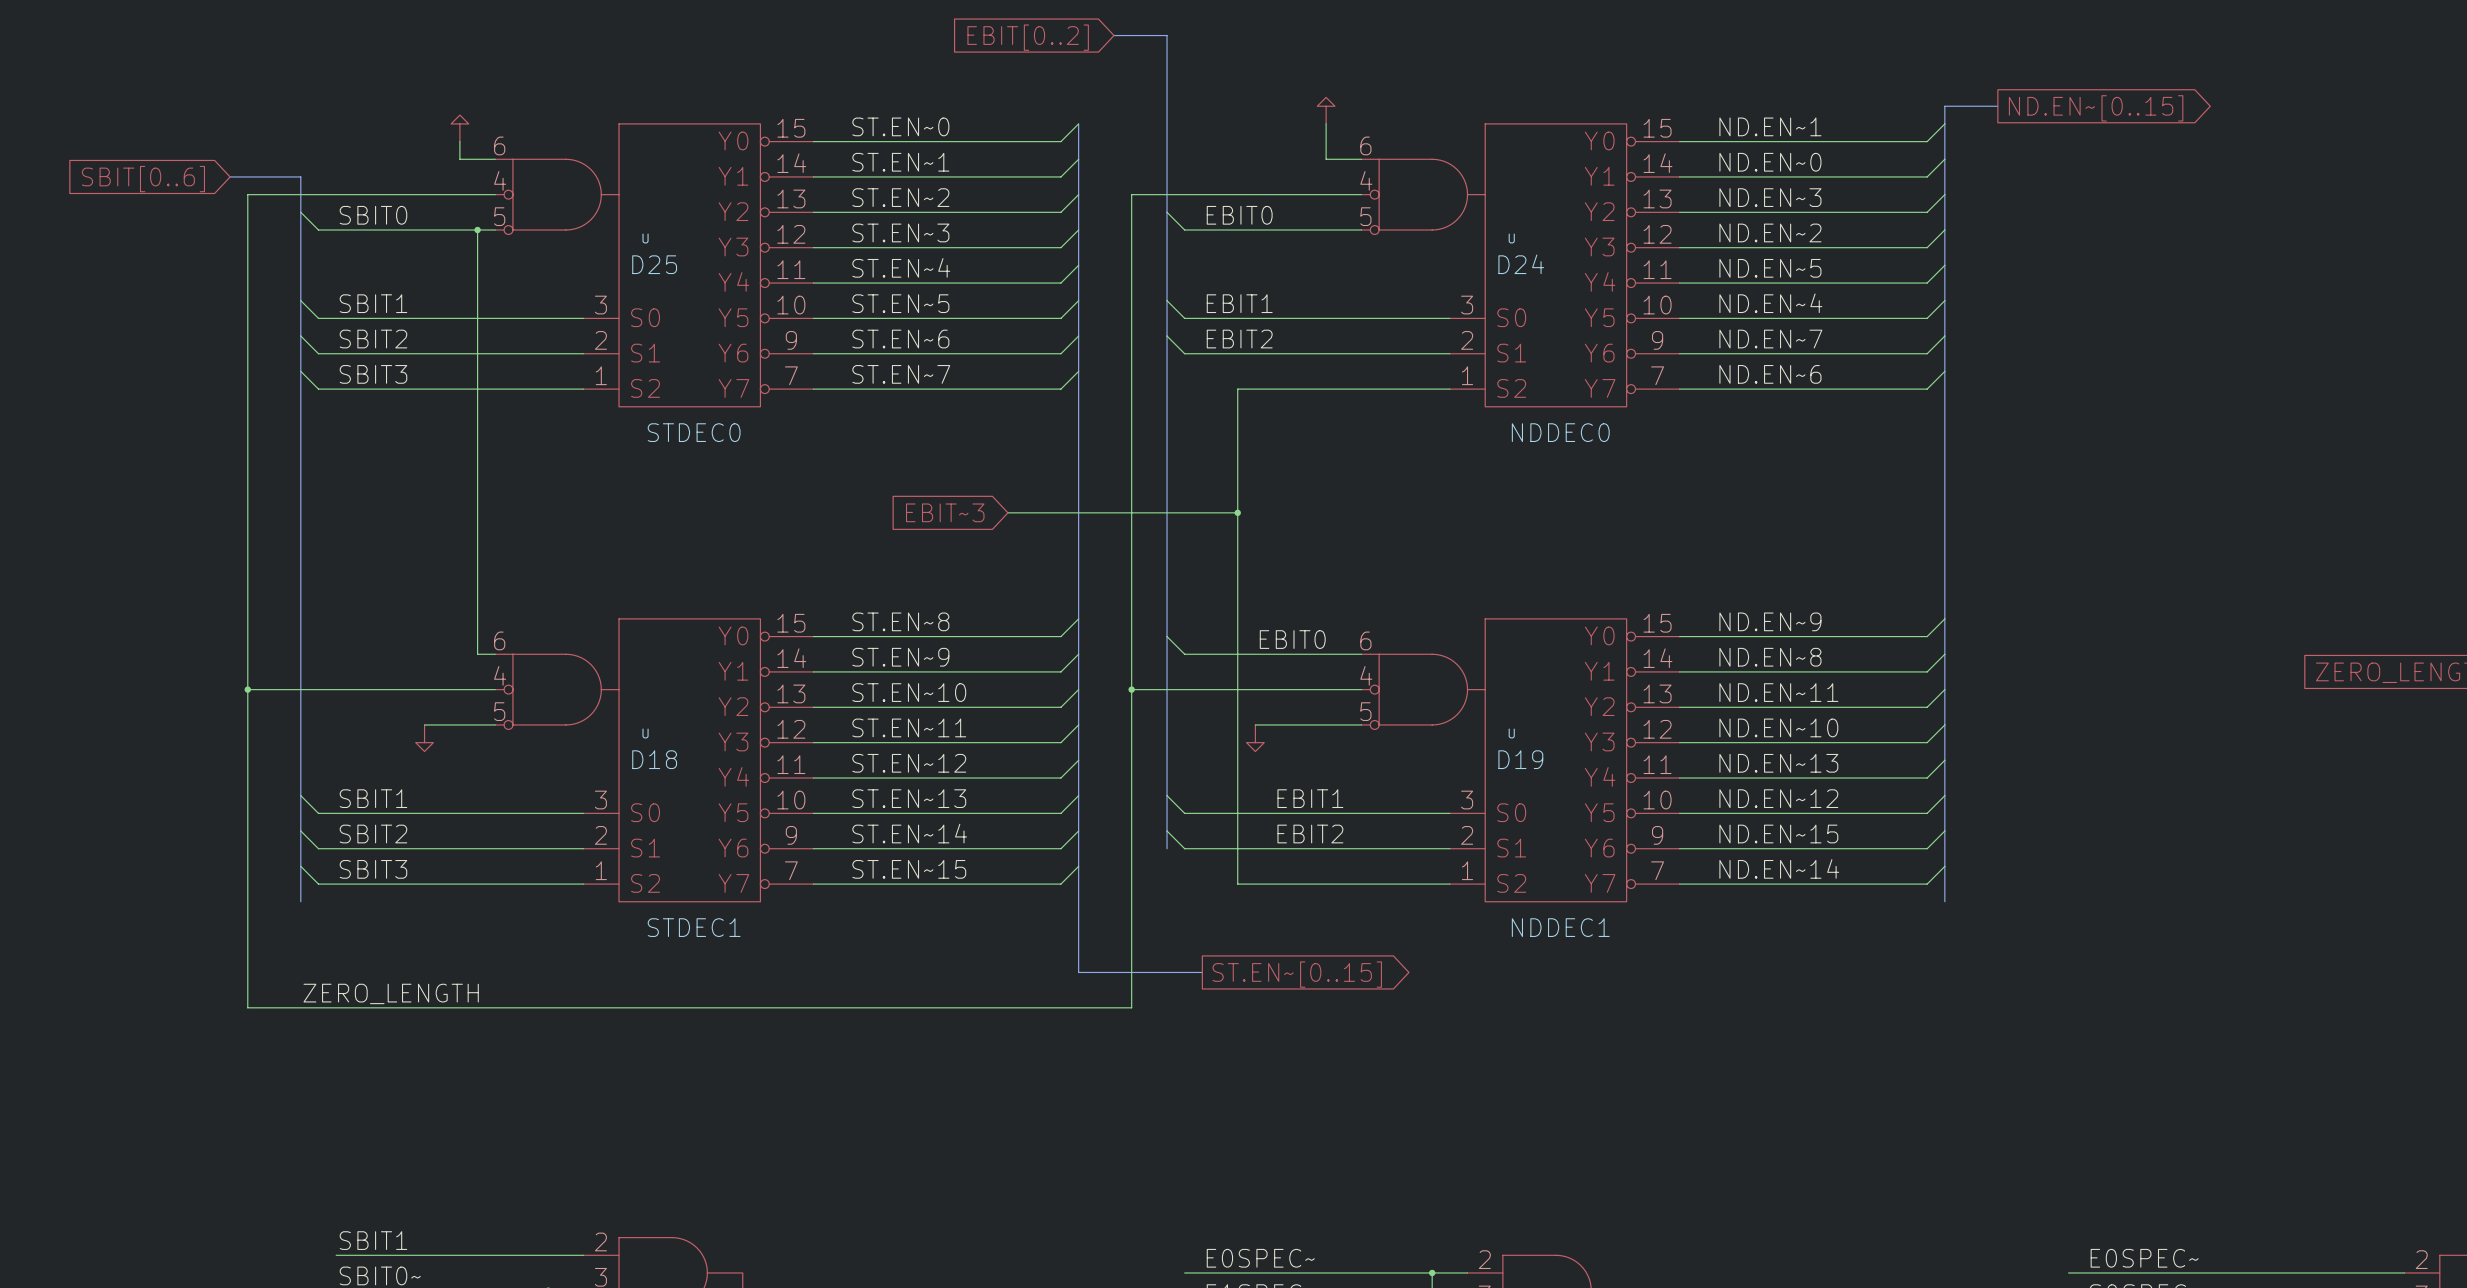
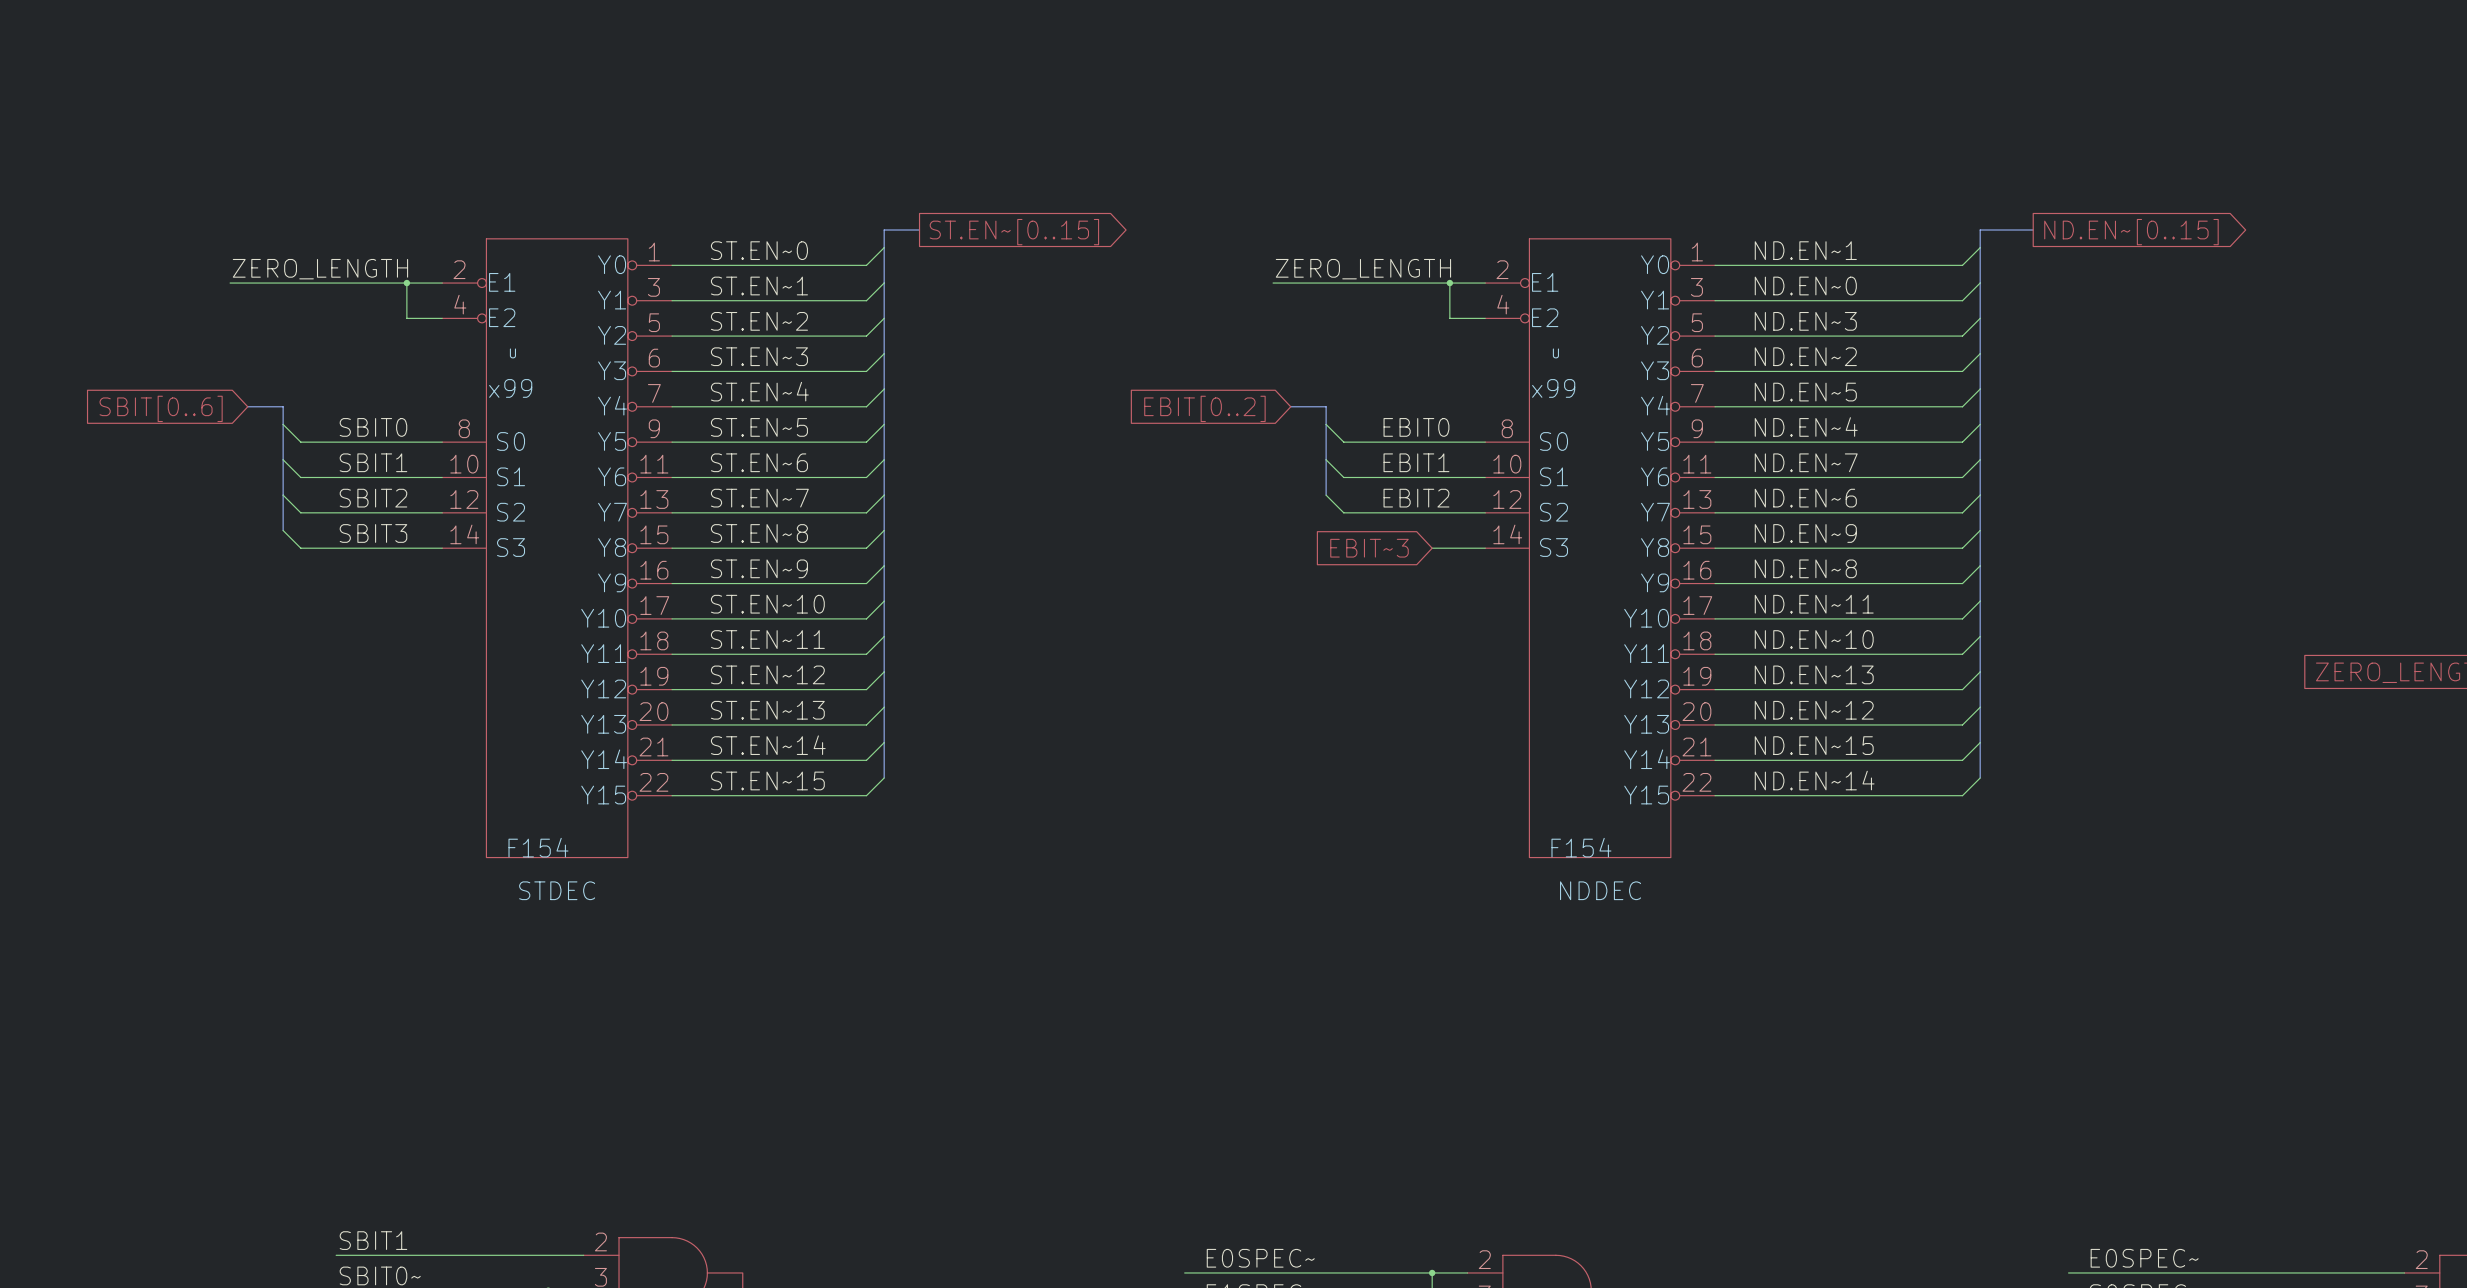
bus: (1113, 35) (1167, 35) (1167, 848) -> none
global label: EBIT[0..2] (1028, 37) -> none
bus: (1997, 106) (1944, 106) (1944, 901) -> none
global label position: ND.EN~[0..15] (2096, 108) -> ND.EN~[0..15] (2131, 232)
power symbol: (1326, 110) -> none
wire: (1078, 123) (1060, 141) (813, 141) -> none
bus: (1078, 123) (1078, 972) (1202, 972) -> none
wire: (1326, 123) (1326, 159) (1361, 159) -> none
wire: (1944, 123) (1927, 141) (1679, 141) -> none
label: ST.EN~0 (900, 126) -> none
label position: ND.EN~1 (1770, 126) -> ND.EN~1 (1805, 250)
power symbol: (459, 128) -> none
wire: (459, 141) (459, 159) (495, 159) -> none
wire: (1078, 159) (1060, 176) (813, 176) -> none
wire: (1944, 159) (1927, 176) (1679, 176) -> none
label: ST.EN~1 (900, 162) -> none
label position: ND.EN~0 (1770, 162) -> ND.EN~0 (1805, 286)
bus: (230, 176) (300, 176) (300, 901) -> none
global label: SBIT[0..6] (143, 179) -> none
wire: (495, 194) (247, 194) (247, 1007) (1131, 1007) (1131, 194) (1361, 194) -> none
wire: (1078, 194) (1060, 212) (813, 212) -> none
wire: (1944, 194) (1927, 212) (1679, 212) -> none
label: ST.EN~2 (900, 197) -> none
label position: ND.EN~3 (1770, 197) -> ND.EN~3 (1805, 321)
wire: (300, 212) (318, 230) (495, 230) -> none
wire: (1167, 212) (1184, 230) (1361, 230) -> none
label: SBIT0 (373, 215) -> none
label: EBIT0 (1239, 215) -> none
wire: (477, 230) (477, 654) (495, 654) -> none
junction: (477, 230) -> none
bus: none -> (919, 230) (884, 230) (884, 778)
wire: (1078, 230) (1060, 247) (813, 247) -> none
wire: (1944, 230) (1927, 247) (1679, 247) -> (1980, 389) (1962, 406) (1715, 406)
bus: none -> (2033, 230) (1980, 230) (1980, 778)
label: ST.EN~3 (900, 232) -> none
global label: none -> ST.EN~[0..15] (1014, 232)
label position: ND.EN~2 (1770, 232) -> ND.EN~2 (1805, 356)
wire: none -> (884, 247) (866, 265) (672, 265)
label: none -> ST.EN~0 (759, 250)
U: (654, 265) -> none
wire: (1078, 265) (1060, 283) (813, 283) -> none
U: (1520, 265) -> none
wire: (1944, 265) (1927, 283) (1679, 283) -> (1980, 247) (1962, 265) (1715, 265)
label: ST.EN~4 (901, 267) -> none
label position: ND.EN~5 (1770, 268) -> ND.EN~5 (1805, 392)
label: none -> ZERO_LENGTH (320, 269)
label: none -> ZERO_LENGTH (1363, 269)
wire: none -> (230, 283) (442, 283)
junction: none -> (406, 283)
wire: none -> (884, 283) (866, 300) (672, 300)
wire: none -> (1273, 283) (1485, 283)
wire: none -> (1449, 283) (1449, 318) (1485, 318)
junction: none -> (1449, 283)
label: none -> ST.EN~1 (759, 286)
wire: (300, 300) (318, 318) (406, 318) -> (406, 283) (406, 318)
wire: (1078, 300) (1060, 318) (813, 318) -> none
wire: (1167, 300) (1184, 318) (1449, 318) -> none
wire: (1944, 300) (1927, 318) (1679, 318) -> (1980, 283) (1962, 300) (1715, 300)
label position: SBIT1 (373, 303) -> SBIT1 (373, 462)
label: ST.EN~5 (900, 303) -> none
label: EBIT1 (1239, 303) -> none
label position: ND.EN~4 (1770, 303) -> ND.EN~4 (1806, 427)
wire: (442, 318) (583, 318) -> none
wire: none -> (884, 318) (866, 336) (672, 336)
label: none -> ST.EN~2 (759, 321)
wire: (300, 336) (318, 353) (583, 353) -> none
wire: (1078, 336) (1060, 353) (813, 353) -> none
wire: (1167, 336) (1184, 353) (1449, 353) -> none
wire: (1944, 336) (1927, 353) (1679, 353) -> (1980, 318) (1962, 336) (1715, 336)
label position: SBIT2 (373, 339) -> SBIT2 (373, 498)
label: ST.EN~6 (900, 339) -> none
label: EBIT2 (1239, 339) -> none
label position: ND.EN~7 (1770, 339) -> ND.EN~7 (1806, 462)
wire: none -> (884, 353) (866, 371) (672, 371)
label: none -> ST.EN~3 (759, 356)
wire: (300, 371) (318, 389) (583, 389) -> none
wire: (1078, 371) (1060, 389) (813, 389) -> none
wire: (1944, 371) (1927, 389) (1679, 389) -> (1980, 353) (1962, 371) (1715, 371)
label position: SBIT3 (373, 374) -> SBIT3 (373, 533)
label: ST.EN~7 (901, 374) -> none
label position: ND.EN~6 (1770, 374) -> ND.EN~6 (1805, 498)
wire: none -> (884, 389) (866, 406) (672, 406)
wire: (1449, 389) (1237, 389) (1237, 884) (1449, 884) -> none
label: none -> ST.EN~4 (759, 391)
bus: none -> (247, 406) (283, 406) (283, 530)
bus: none -> (1290, 406) (1326, 406) (1326, 495)
global label: none -> SBIT[0..6] (161, 408)
global label: none -> EBIT[0..2] (1204, 408)
wire: none -> (283, 424) (300, 442) (442, 442)
wire: none -> (884, 424) (866, 442) (672, 442)
wire: none -> (1326, 424) (1343, 442) (1485, 442)
wire: none -> (1980, 424) (1962, 442) (1715, 442)
label: none -> SBIT0 (373, 427)
label: none -> ST.EN~5 (759, 427)
label: none -> EBIT0 (1416, 427)
wire: none -> (283, 459) (300, 477) (442, 477)
wire: none -> (884, 459) (866, 477) (672, 477)
wire: none -> (1326, 459) (1343, 477) (1485, 477)
wire: none -> (1980, 459) (1962, 477) (1715, 477)
label: none -> ST.EN~6 (759, 462)
label: none -> EBIT1 (1416, 462)
wire: none -> (283, 495) (300, 512) (442, 512)
wire: none -> (884, 495) (866, 512) (672, 512)
wire: none -> (1326, 495) (1343, 512) (1485, 512)
wire: none -> (1980, 495) (1962, 512) (1715, 512)
label: none -> ST.EN~7 (759, 498)
label: none -> EBIT2 (1416, 498)
global label: EBIT~3 (945, 512) -> none
wire: (1007, 512) (1237, 512) -> none
junction: (1237, 512) -> none
wire: none -> (283, 530) (300, 548) (442, 548)
wire: none -> (884, 530) (866, 548) (672, 548)
wire: none -> (1980, 530) (1962, 548) (1715, 548)
U: none -> F154 (557, 548)
global label: none -> EBIT~3 (1369, 548)
wire: none -> (1432, 548) (1485, 548)
U: none -> F154 (1600, 548)
wire: none -> (884, 565) (866, 583) (672, 583)
wire: none -> (1980, 565) (1962, 583) (1715, 583)
wire: none -> (884, 601) (866, 618) (672, 618)
wire: (1078, 618) (1060, 636) (813, 636) -> none
wire: (1944, 618) (1927, 636) (1679, 636) -> (1980, 601) (1962, 618) (1715, 618)
label position: ST.EN~8 (900, 621) -> ST.EN~8 (759, 533)
label position: ND.EN~9 (1770, 621) -> ND.EN~9 (1805, 533)
wire: none -> (884, 636) (866, 654) (672, 654)
wire: (1167, 636) (1184, 654) (1361, 654) -> none
label: EBIT0 (1292, 639) -> none
wire: (1078, 654) (1060, 671) (813, 671) -> none
wire: (1944, 654) (1927, 671) (1679, 671) -> (1980, 636) (1962, 654) (1715, 654)
label position: ST.EN~9 (900, 657) -> ST.EN~9 (759, 568)
label position: ND.EN~8 (1770, 657) -> ND.EN~8 (1805, 568)
wire: none -> (884, 671) (866, 689) (672, 689)
wire: (247, 689) (495, 689) -> none
junction: (247, 689) -> none
wire: (1078, 689) (1060, 707) (813, 707) -> none
wire: (1131, 689) (1361, 689) -> none
junction: (1131, 689) -> none
wire: (1944, 689) (1927, 707) (1679, 707) -> (1980, 671) (1962, 689) (1715, 689)
label position: ST.EN~10 (909, 692) -> ST.EN~10 (767, 604)
label position: ND.EN~11 (1778, 692) -> ND.EN~11 (1814, 604)
wire: none -> (884, 707) (866, 724) (672, 724)
wire: (424, 724) (495, 724) -> none
wire: (1078, 724) (1060, 742) (813, 742) -> none
wire: (1255, 724) (1361, 724) -> none
wire: (1944, 724) (1927, 742) (1679, 742) -> (1980, 707) (1962, 724) (1715, 724)
label position: ST.EN~11 (909, 727) -> ST.EN~11 (767, 639)
label position: ND.EN~10 (1778, 727) -> ND.EN~10 (1814, 639)
power symbol: (424, 738) -> none
power symbol: (1255, 738) -> none
wire: none -> (884, 742) (866, 760) (672, 760)
U: (654, 760) -> none
wire: (1078, 760) (1060, 778) (813, 778) -> none
U: (1520, 760) -> none
wire: (1944, 760) (1927, 778) (1679, 778) -> (1980, 742) (1962, 760) (1715, 760)
label position: ST.EN~12 (909, 763) -> ST.EN~12 (767, 674)
label position: ND.EN~13 (1778, 763) -> ND.EN~13 (1814, 674)
wire: none -> (884, 778) (866, 795) (672, 795)
wire: (300, 795) (318, 813) (583, 813) -> none
wire: (1078, 795) (1060, 813) (813, 813) -> none
wire: (1167, 795) (1184, 813) (1449, 813) -> none
wire: (1944, 795) (1927, 813) (1679, 813) -> (1980, 778) (1962, 795) (1715, 795)
label: SBIT1 (373, 798) -> none
label position: ST.EN~13 (909, 798) -> ST.EN~13 (767, 710)
label: EBIT1 (1310, 798) -> none
label position: ND.EN~12 (1778, 798) -> ND.EN~12 (1814, 710)
wire: (300, 831) (318, 848) (583, 848) -> none
wire: (1078, 831) (1060, 848) (813, 848) -> none
wire: (1167, 831) (1184, 848) (1449, 848) -> none
wire: (1944, 831) (1927, 848) (1679, 848) -> none
label position: ST.EN~14 (909, 833) -> ST.EN~14 (768, 745)
label: SBIT2 (373, 834) -> none
label: EBIT2 (1310, 834) -> none
label position: ND.EN~15 (1778, 834) -> ND.EN~15 (1814, 745)
wire: (300, 866) (318, 884) (583, 884) -> none
wire: (1078, 866) (1060, 884) (813, 884) -> none
wire: (1944, 866) (1927, 884) (1679, 884) -> none
label position: ND.EN~14 (1779, 868) -> ND.EN~14 (1814, 780)
label: SBIT3 (373, 869) -> none
label position: ST.EN~15 (909, 869) -> ST.EN~15 (767, 780)
global label: ST.EN~[0..15] (1297, 974) -> none
label: ZERO_LENGTH (391, 993) -> none

